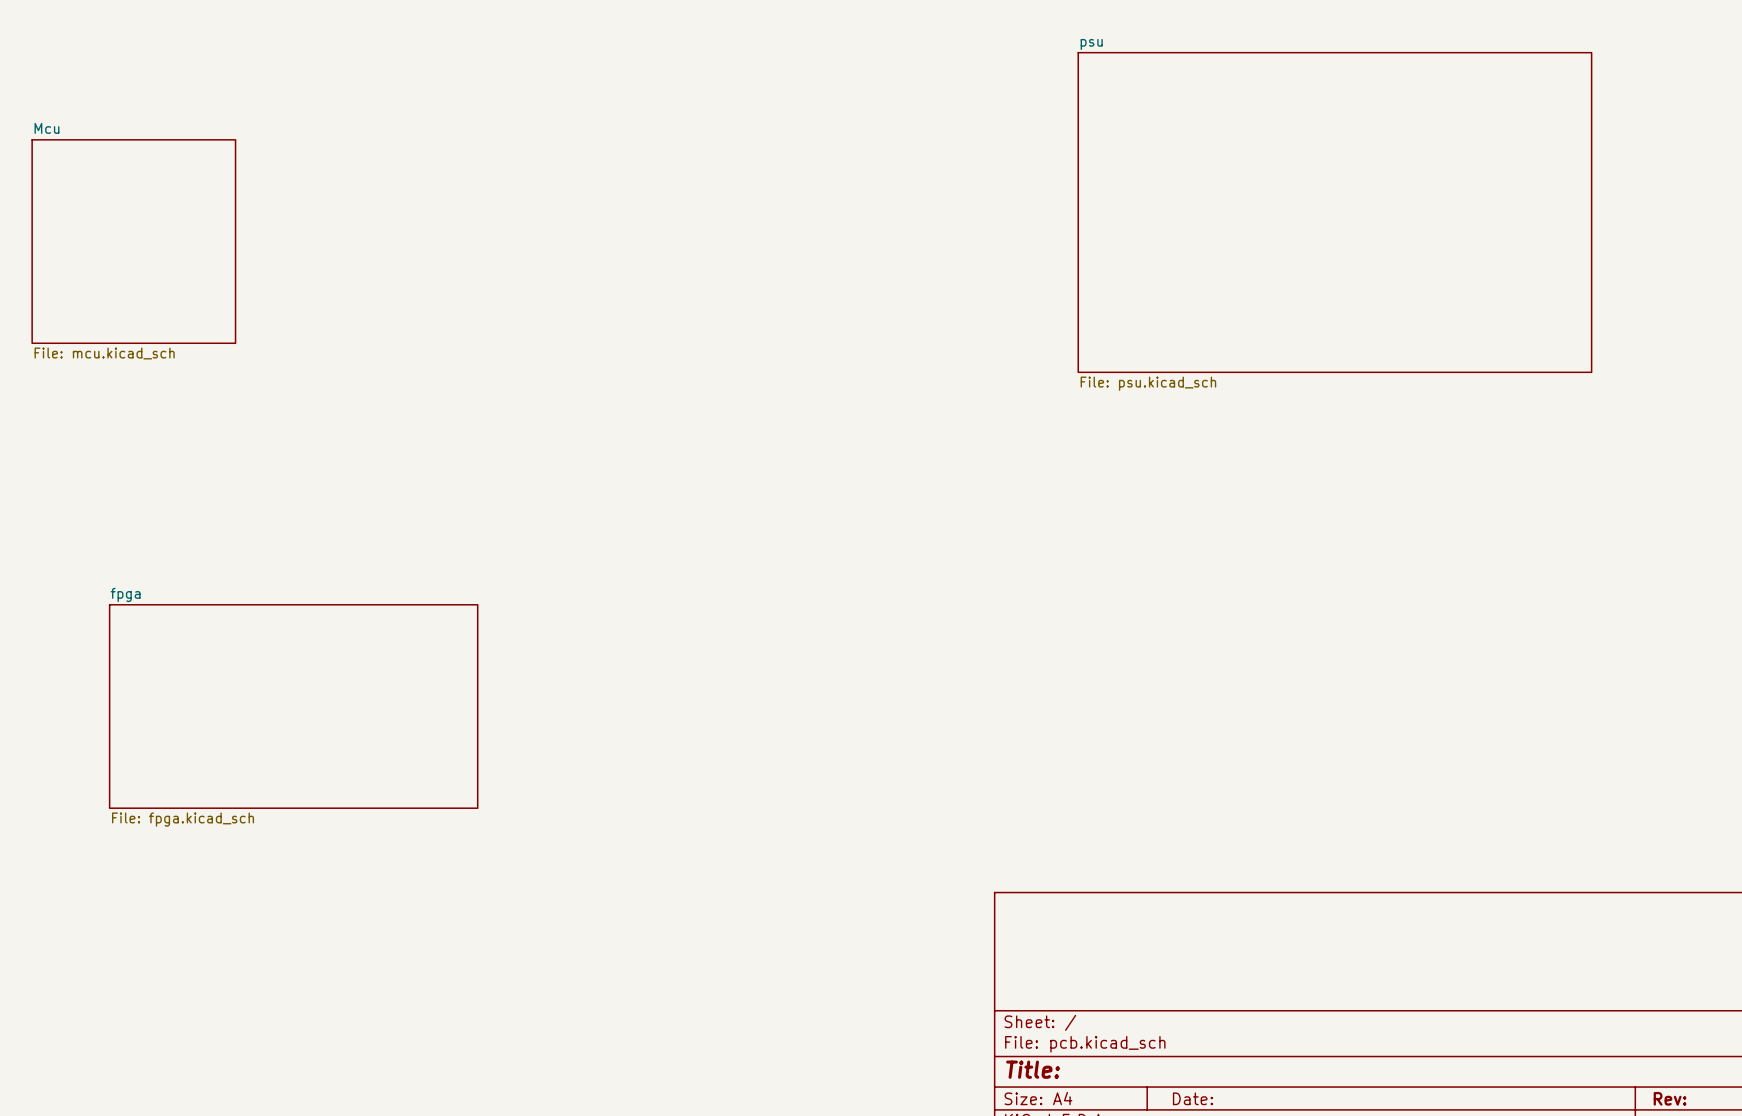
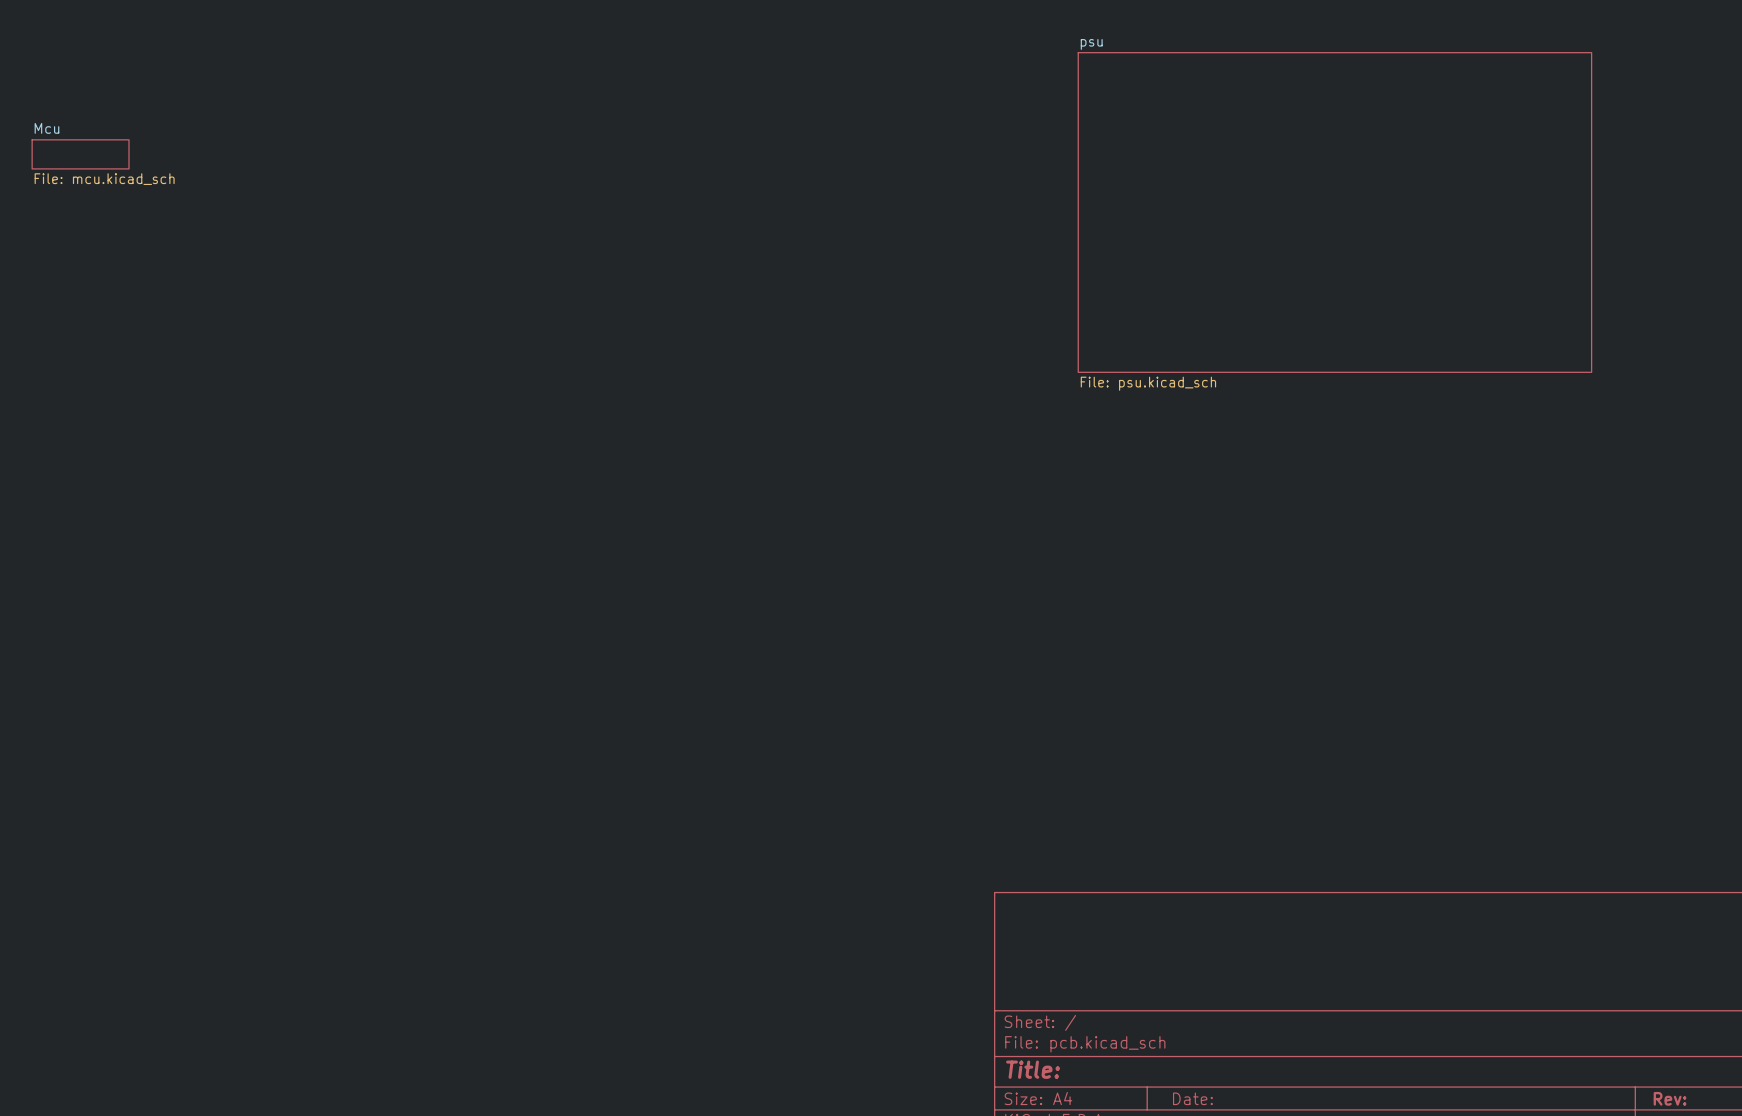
sheet Mcu: none -> File: mcu.kicad_sch (80, 154)
sheet Mcu: File: mcu.kicad_sch (133, 241) -> none
sheet fpga: File: fpga.kicad_sch (293, 706) -> none

